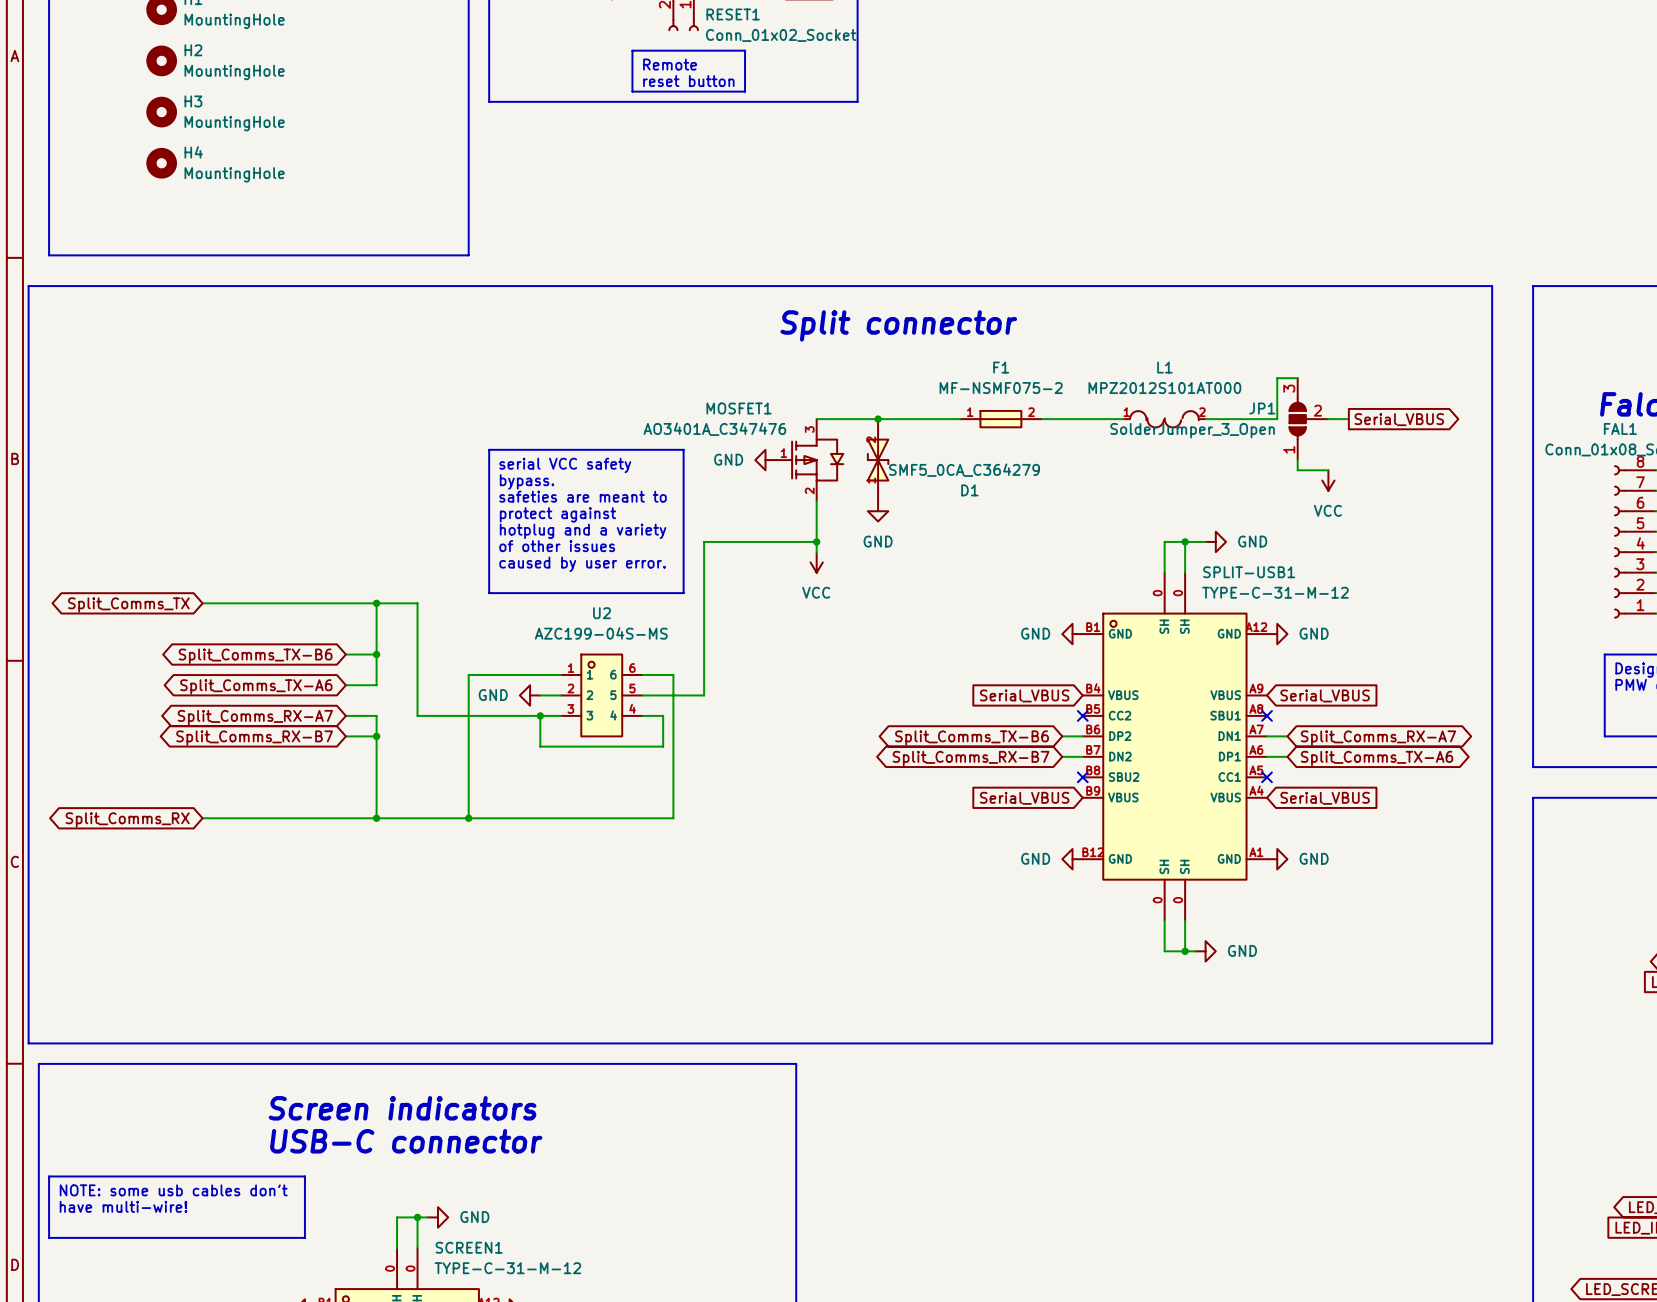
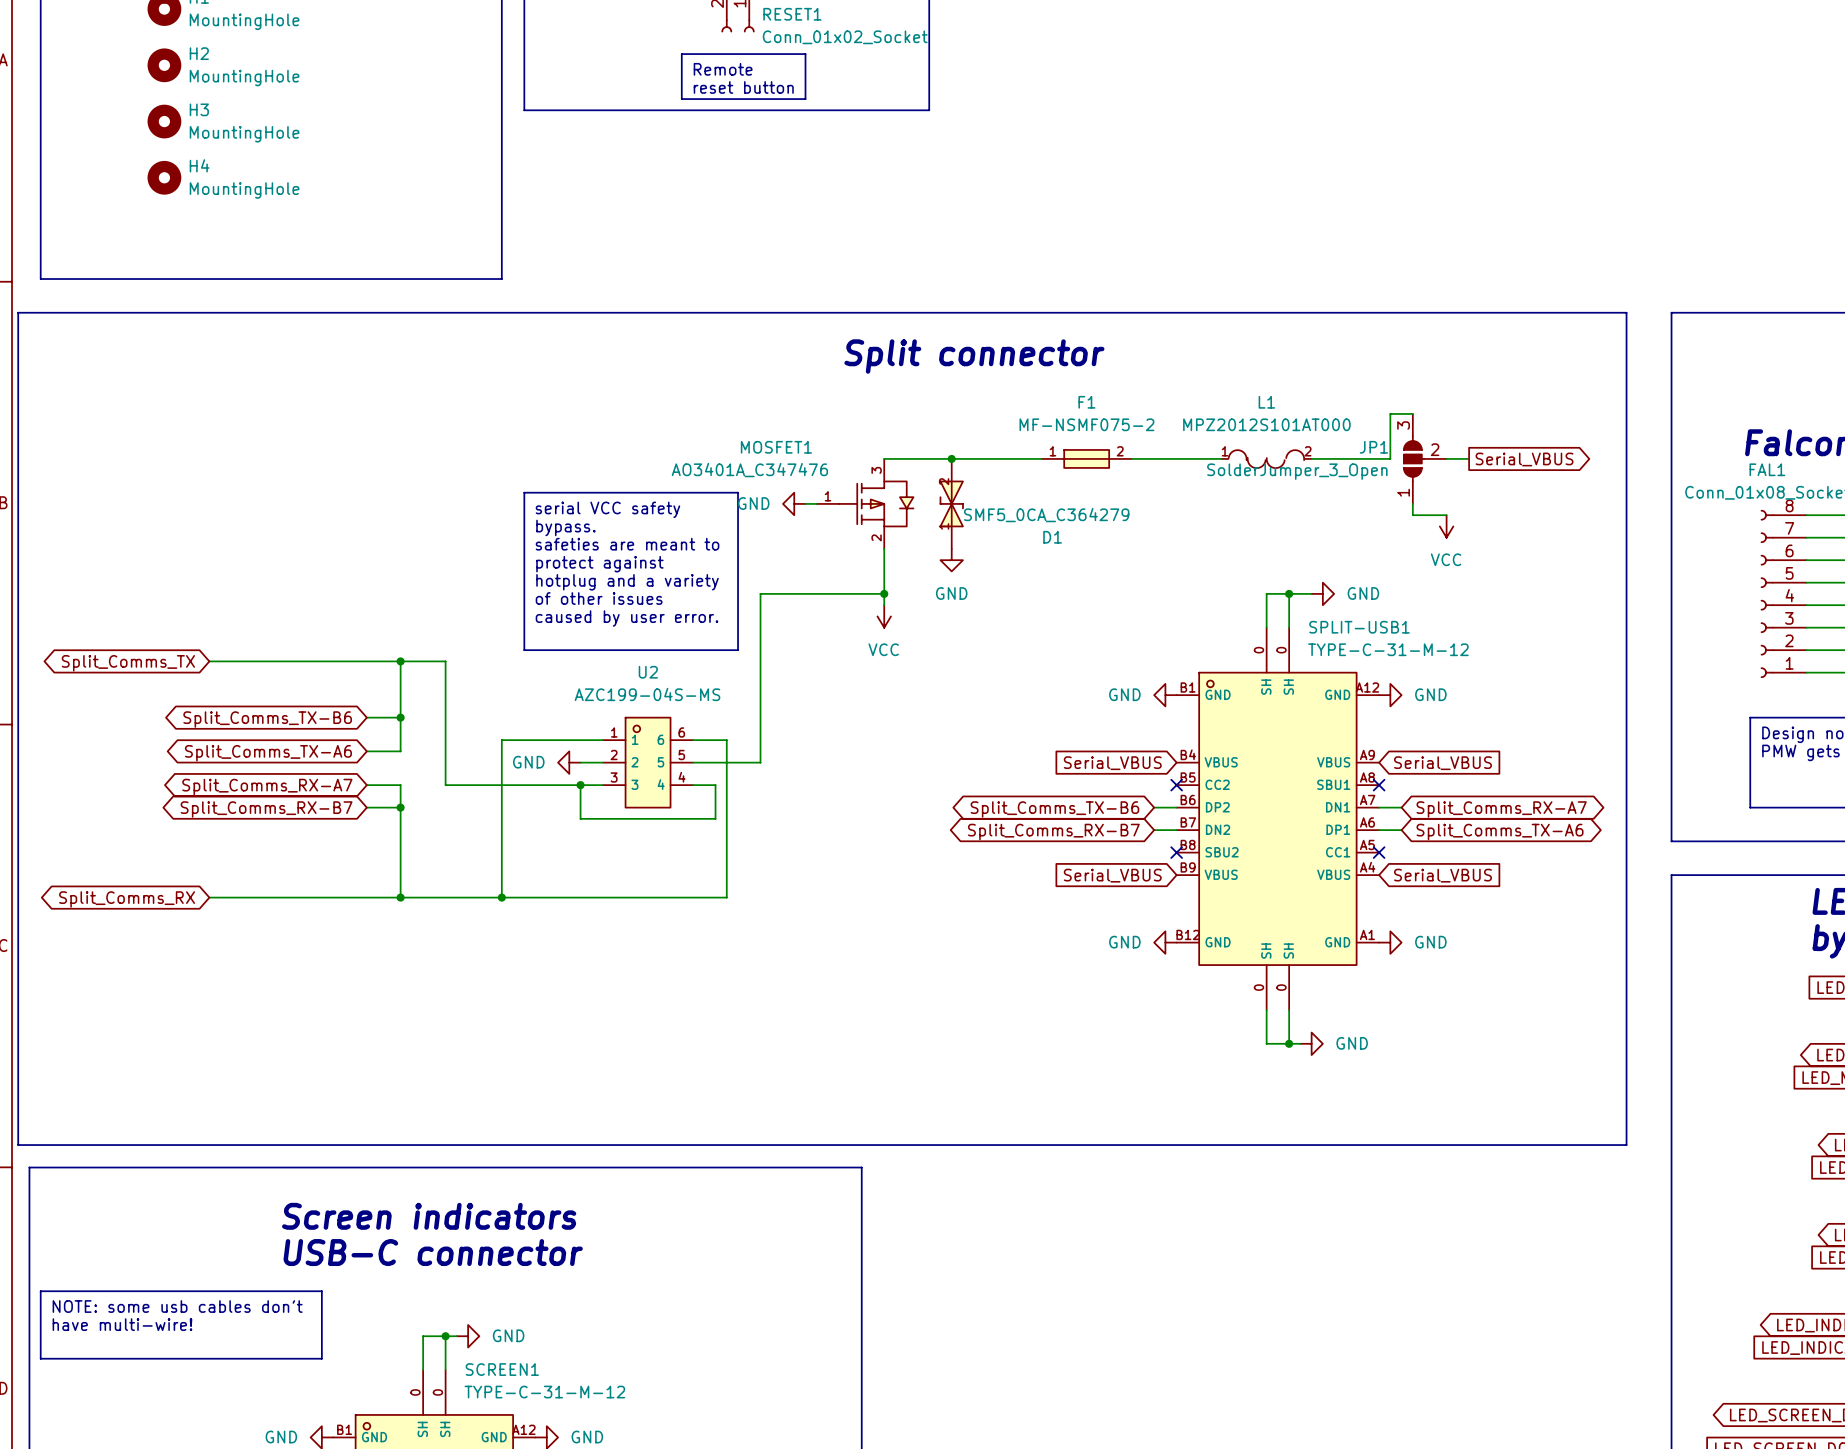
MOSFET1 symbol: [775, 419, 844, 502] -> [816, 458, 914, 549]
wire: none -> (805, 503) (816, 503)
power symbol position: GND (765, 460) -> GND (794, 503)

